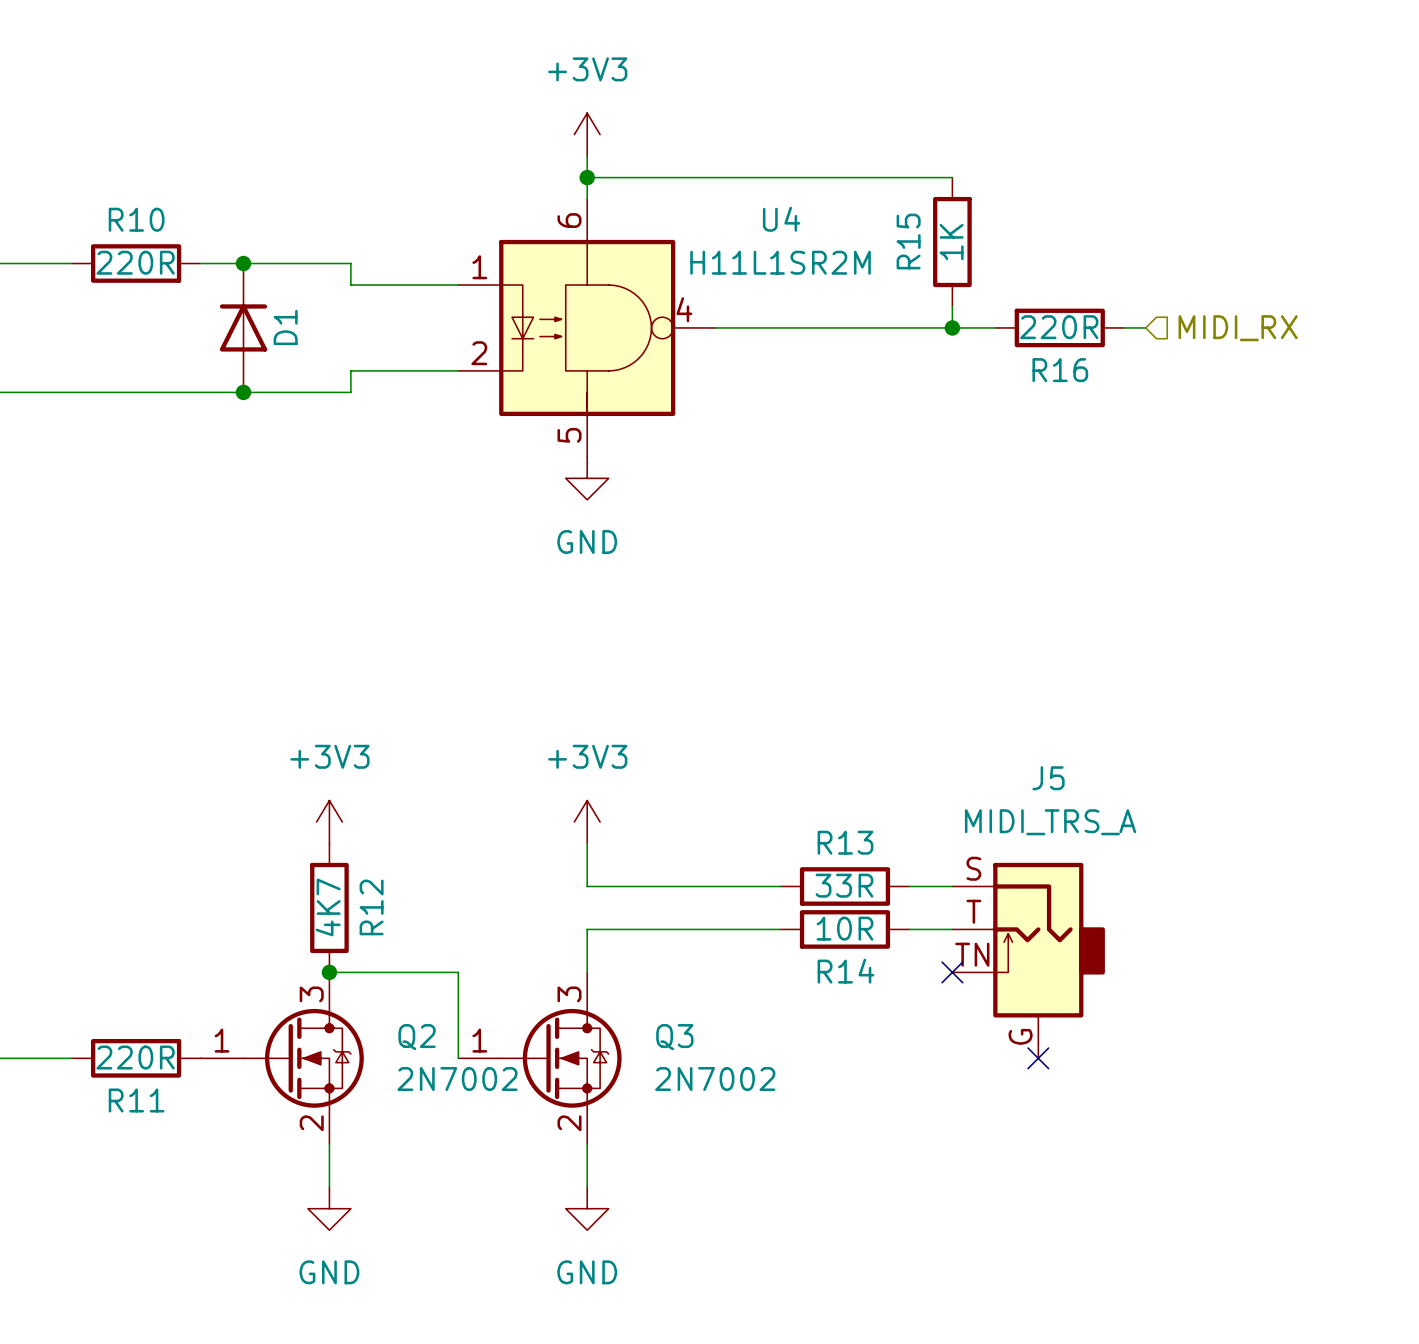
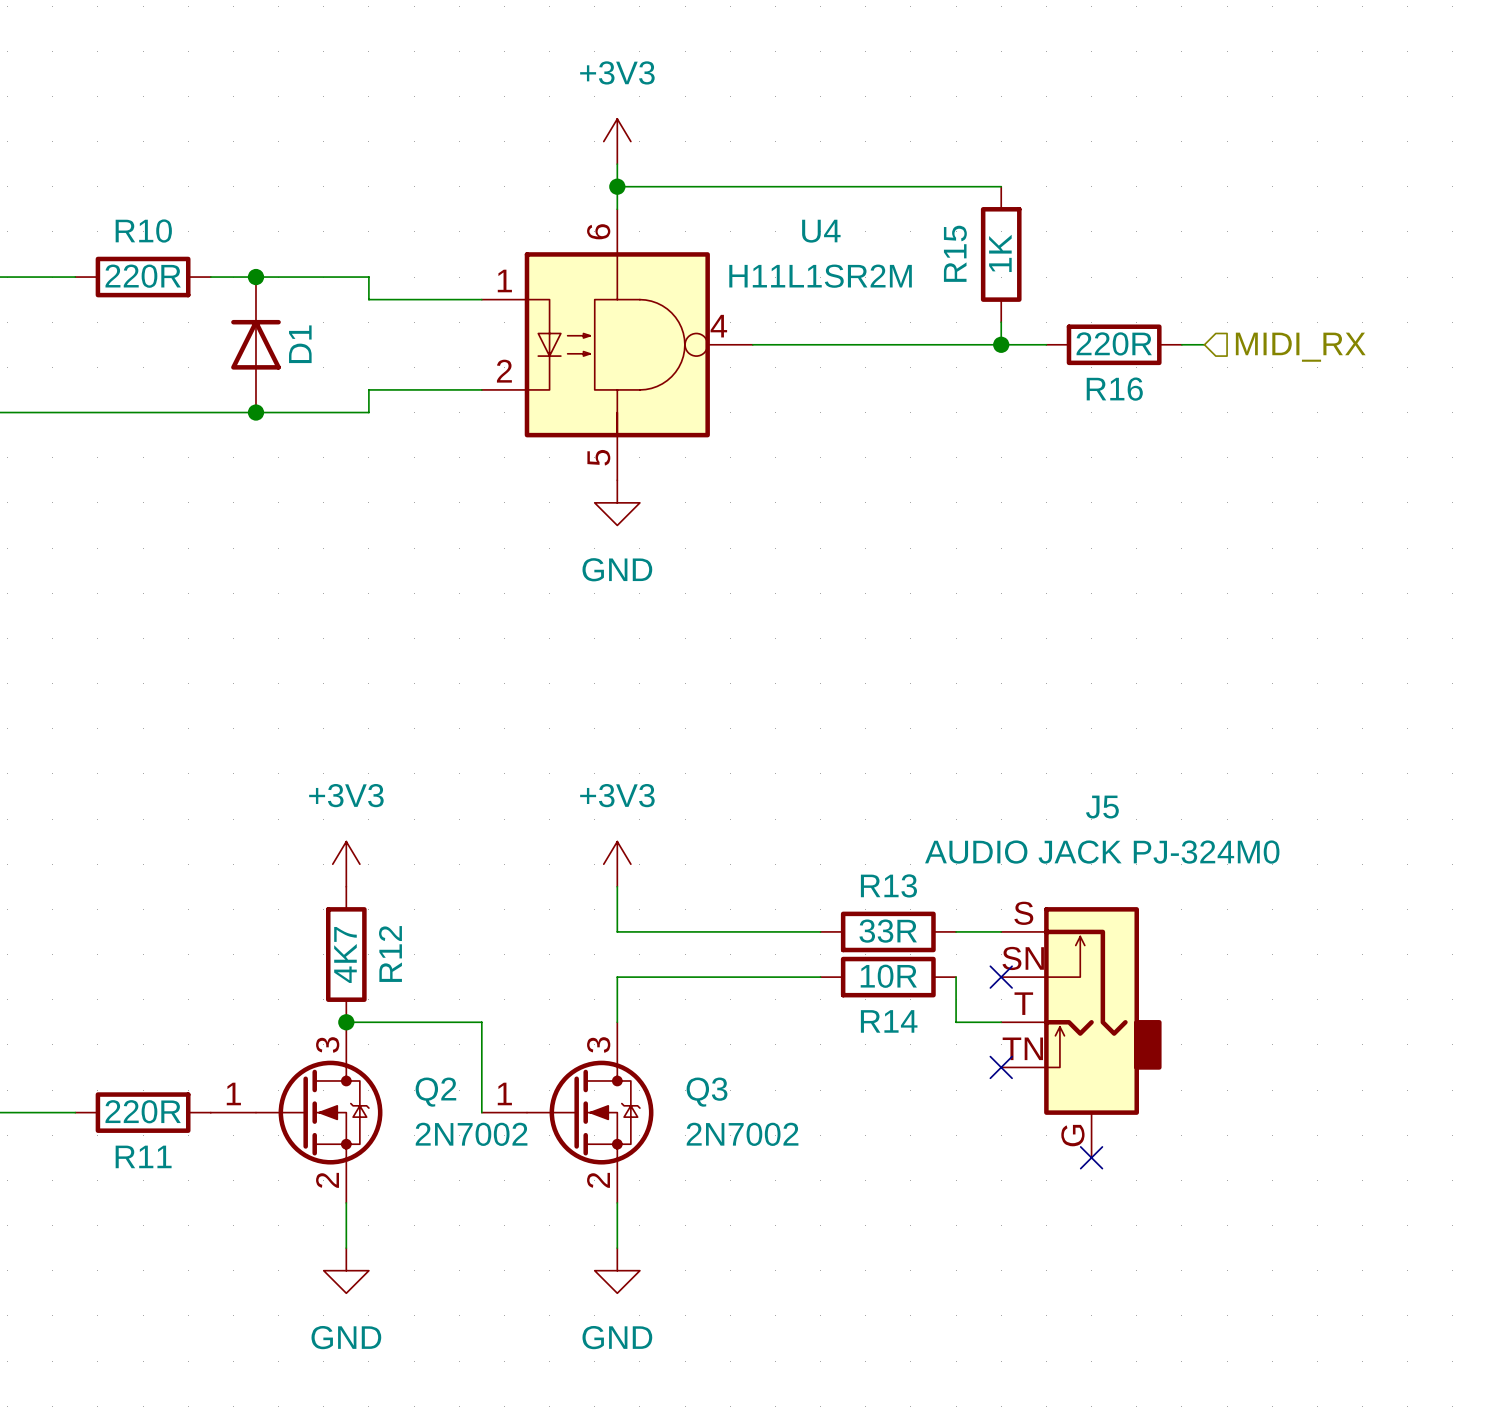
J5 value: MIDI_TRS_A (1050, 822) -> AUDIO JACK PJ-324M0 (1102, 852)
J5 symbol: [952, 862, 1105, 1059] -> [1001, 907, 1162, 1158]
wire: (909, 929) (952, 929) -> (956, 977) (956, 1022) (1001, 1022)
no-connect mark: none -> (1001, 977)
no-connect mark: (952, 972) -> none
no-connect mark: none -> (1001, 1067)
no-connect mark position: (1038, 1058) -> (1091, 1157)

